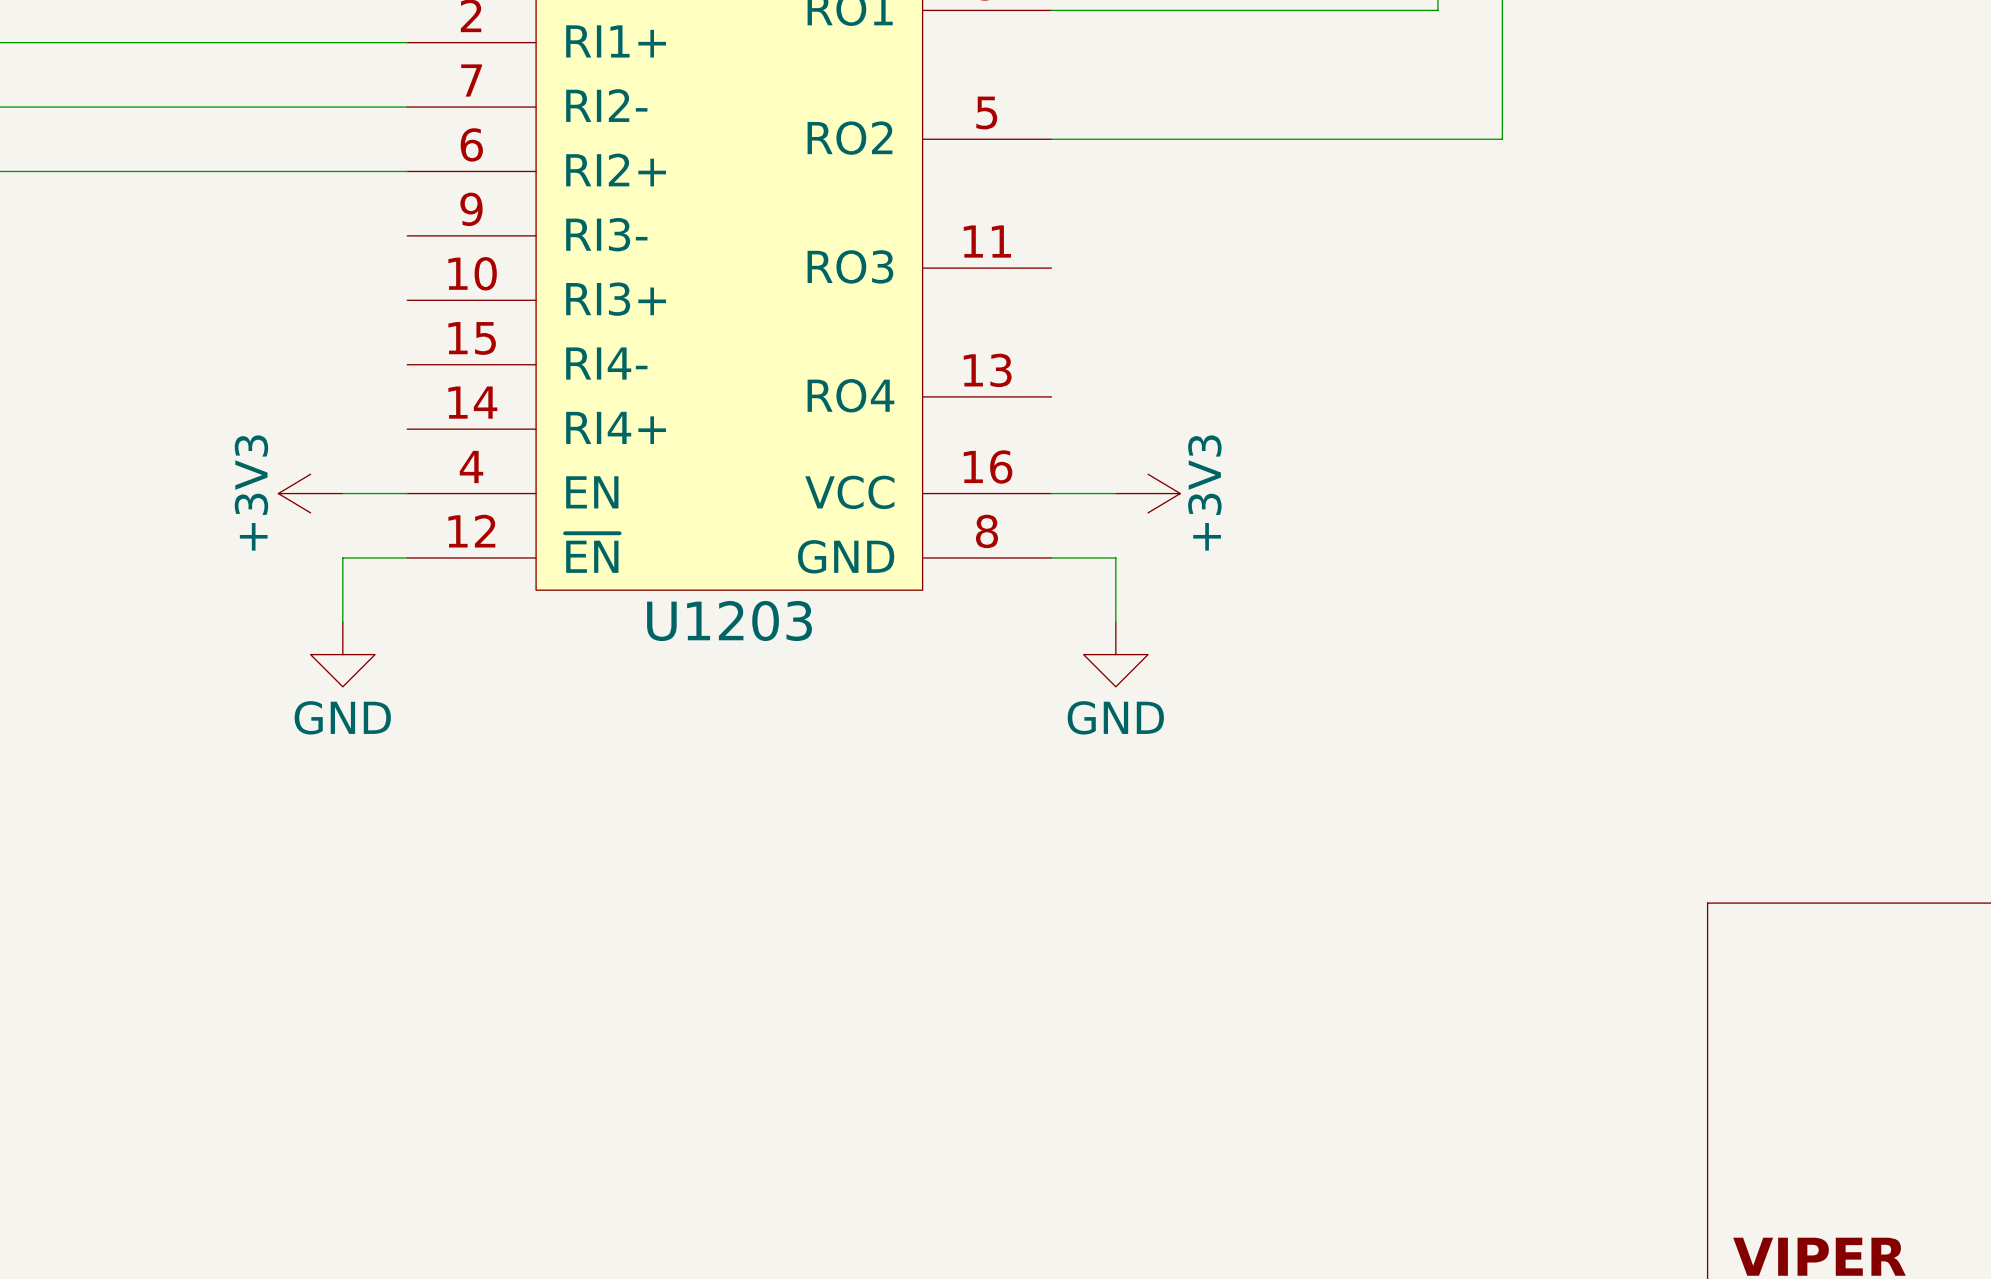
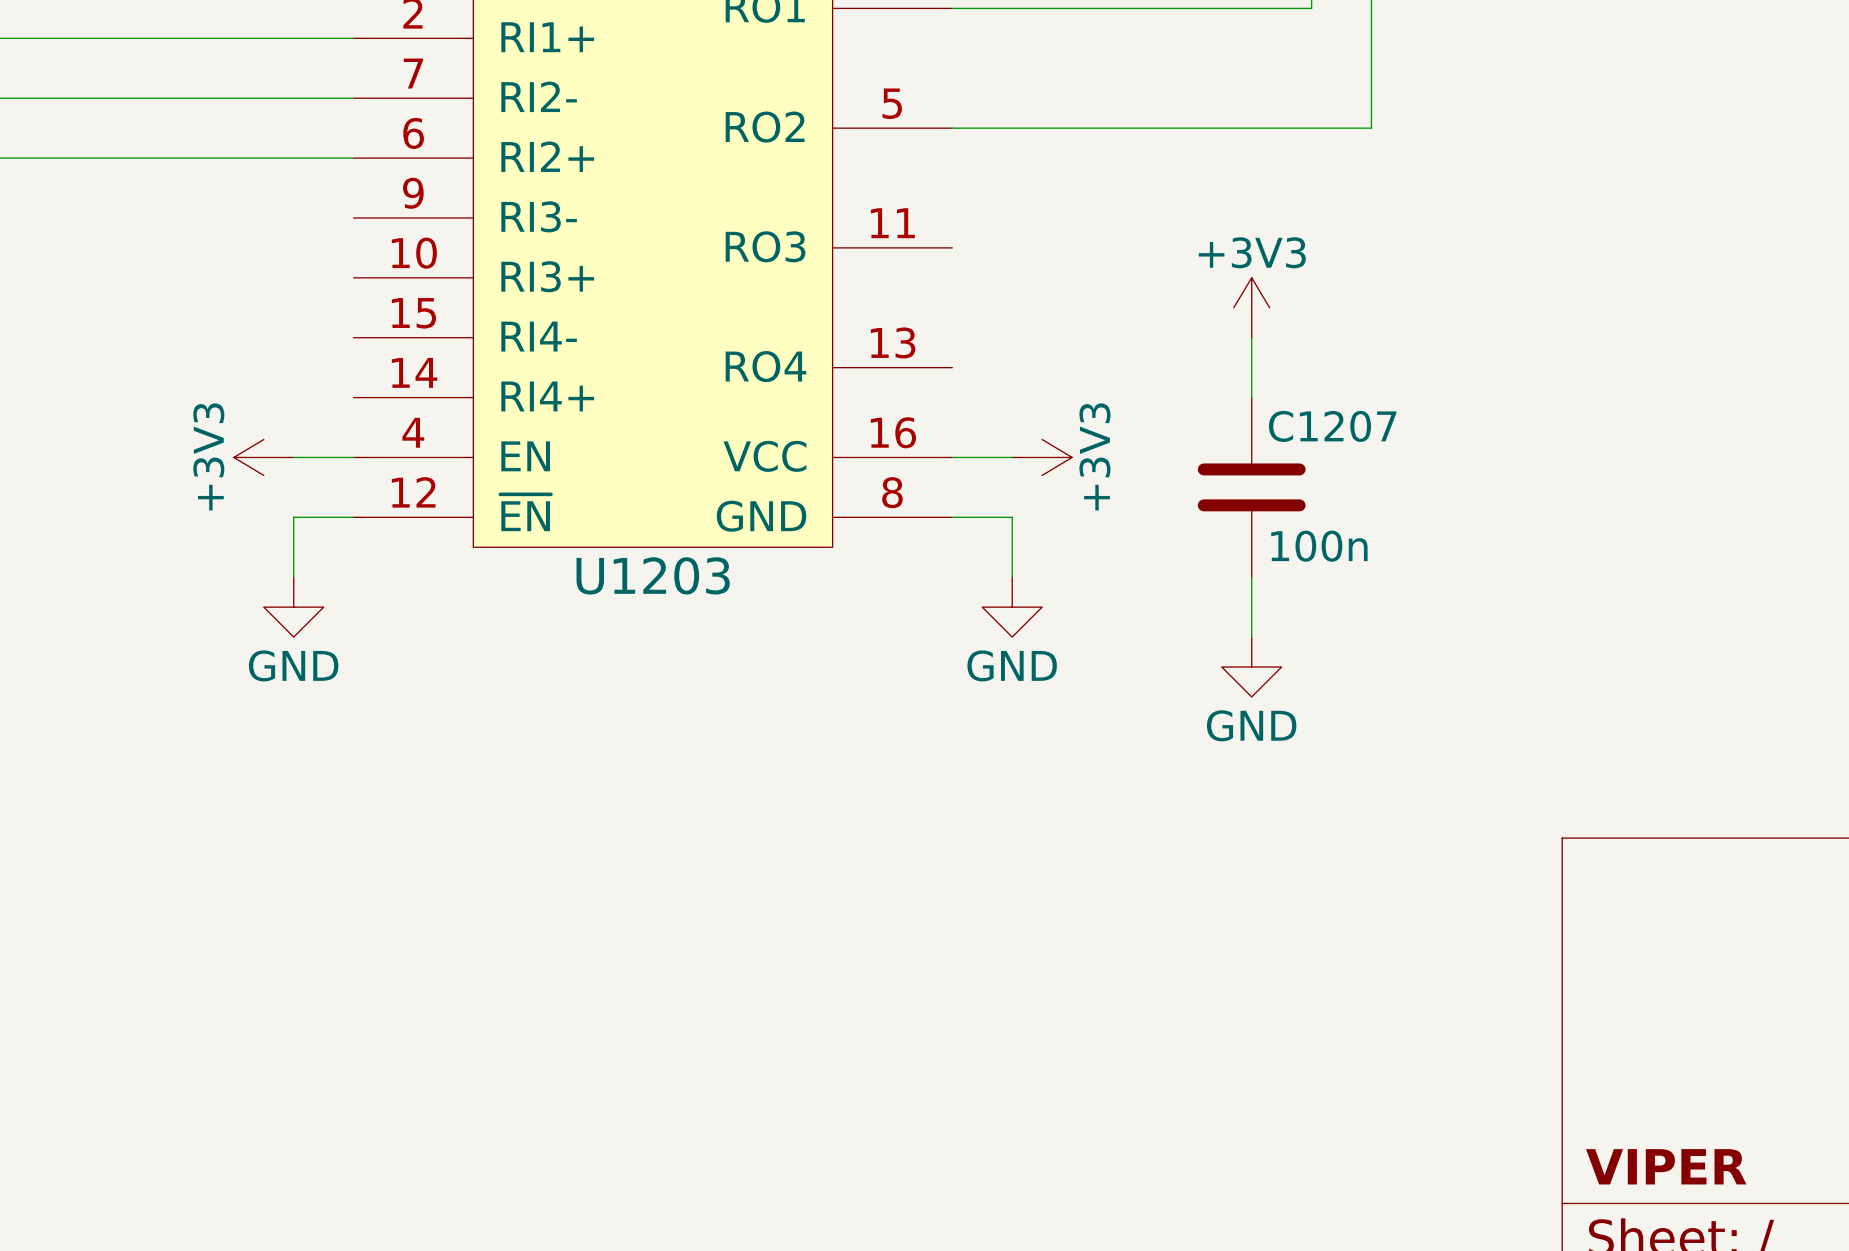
power symbol: none -> +3V3 (1251, 307)
wire: none -> (1251, 337) (1251, 397)
C1207: none -> 100n (1251, 487)
wire: none -> (1251, 577) (1251, 637)
power symbol: none -> GND (1251, 667)

